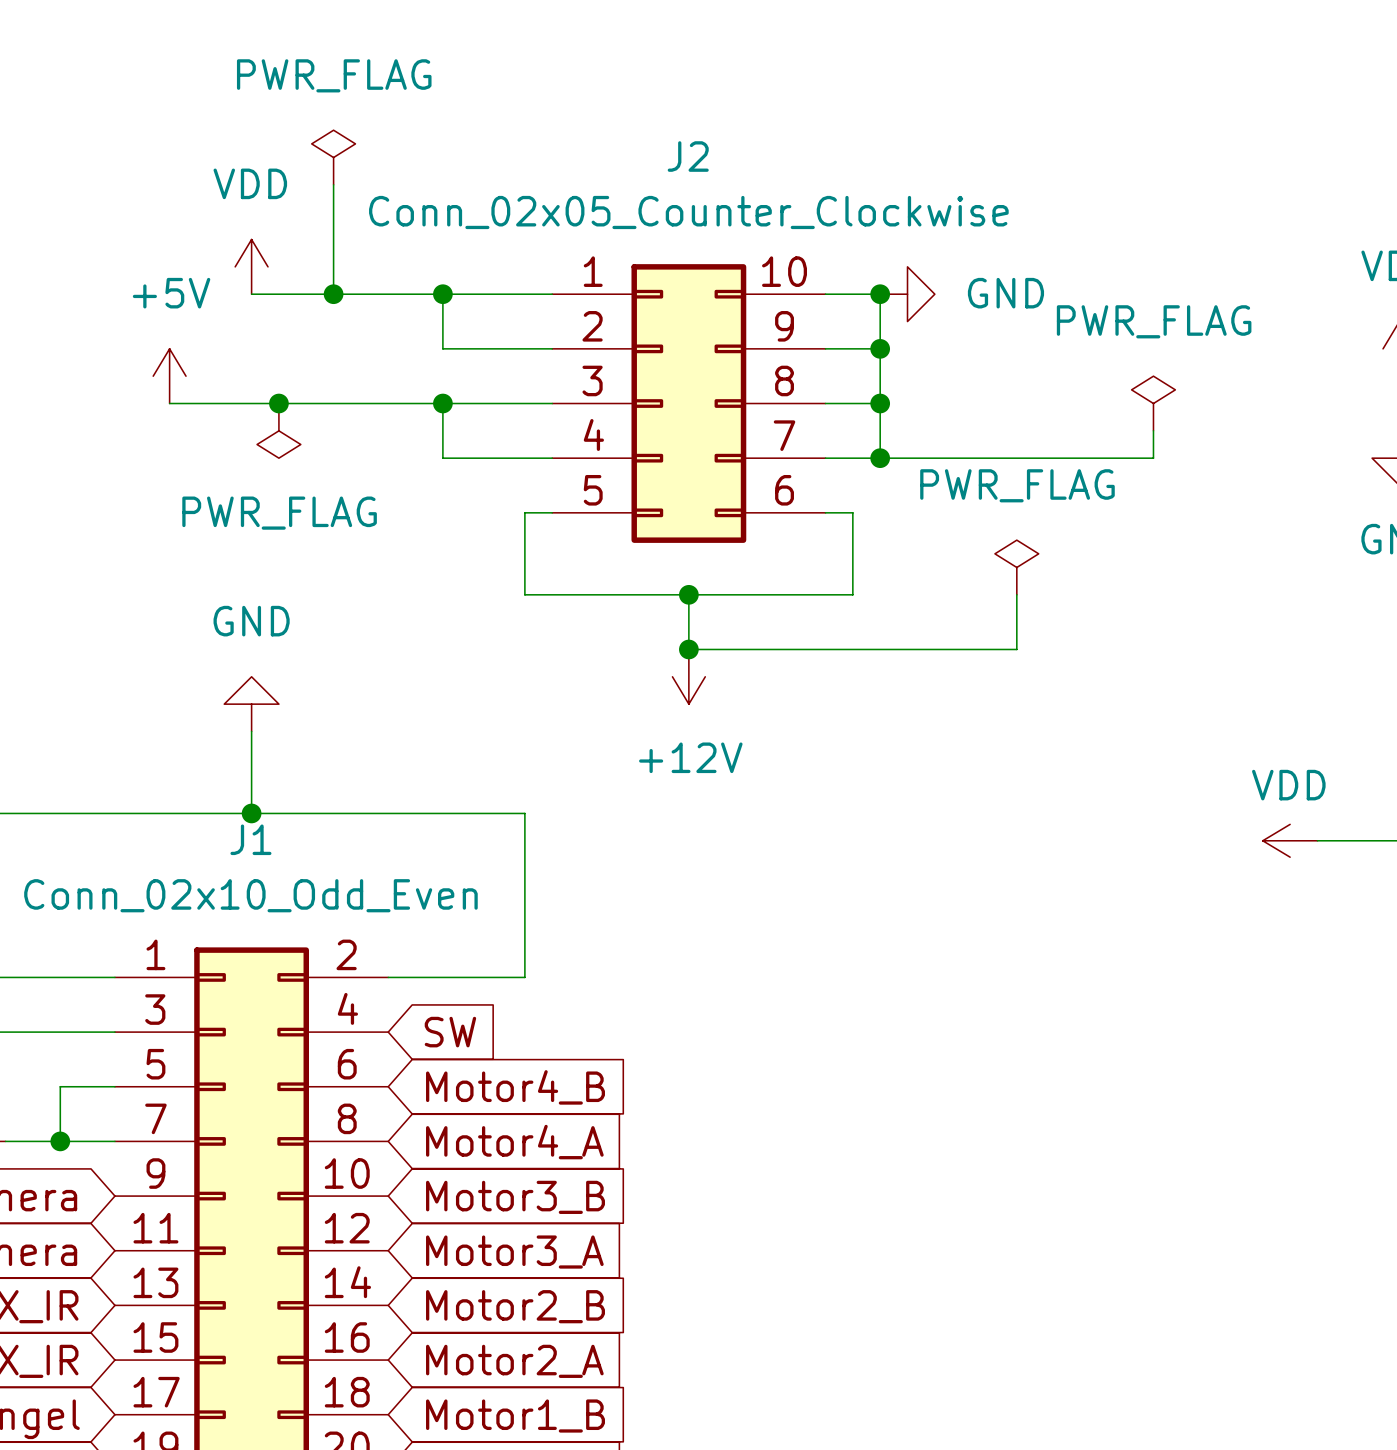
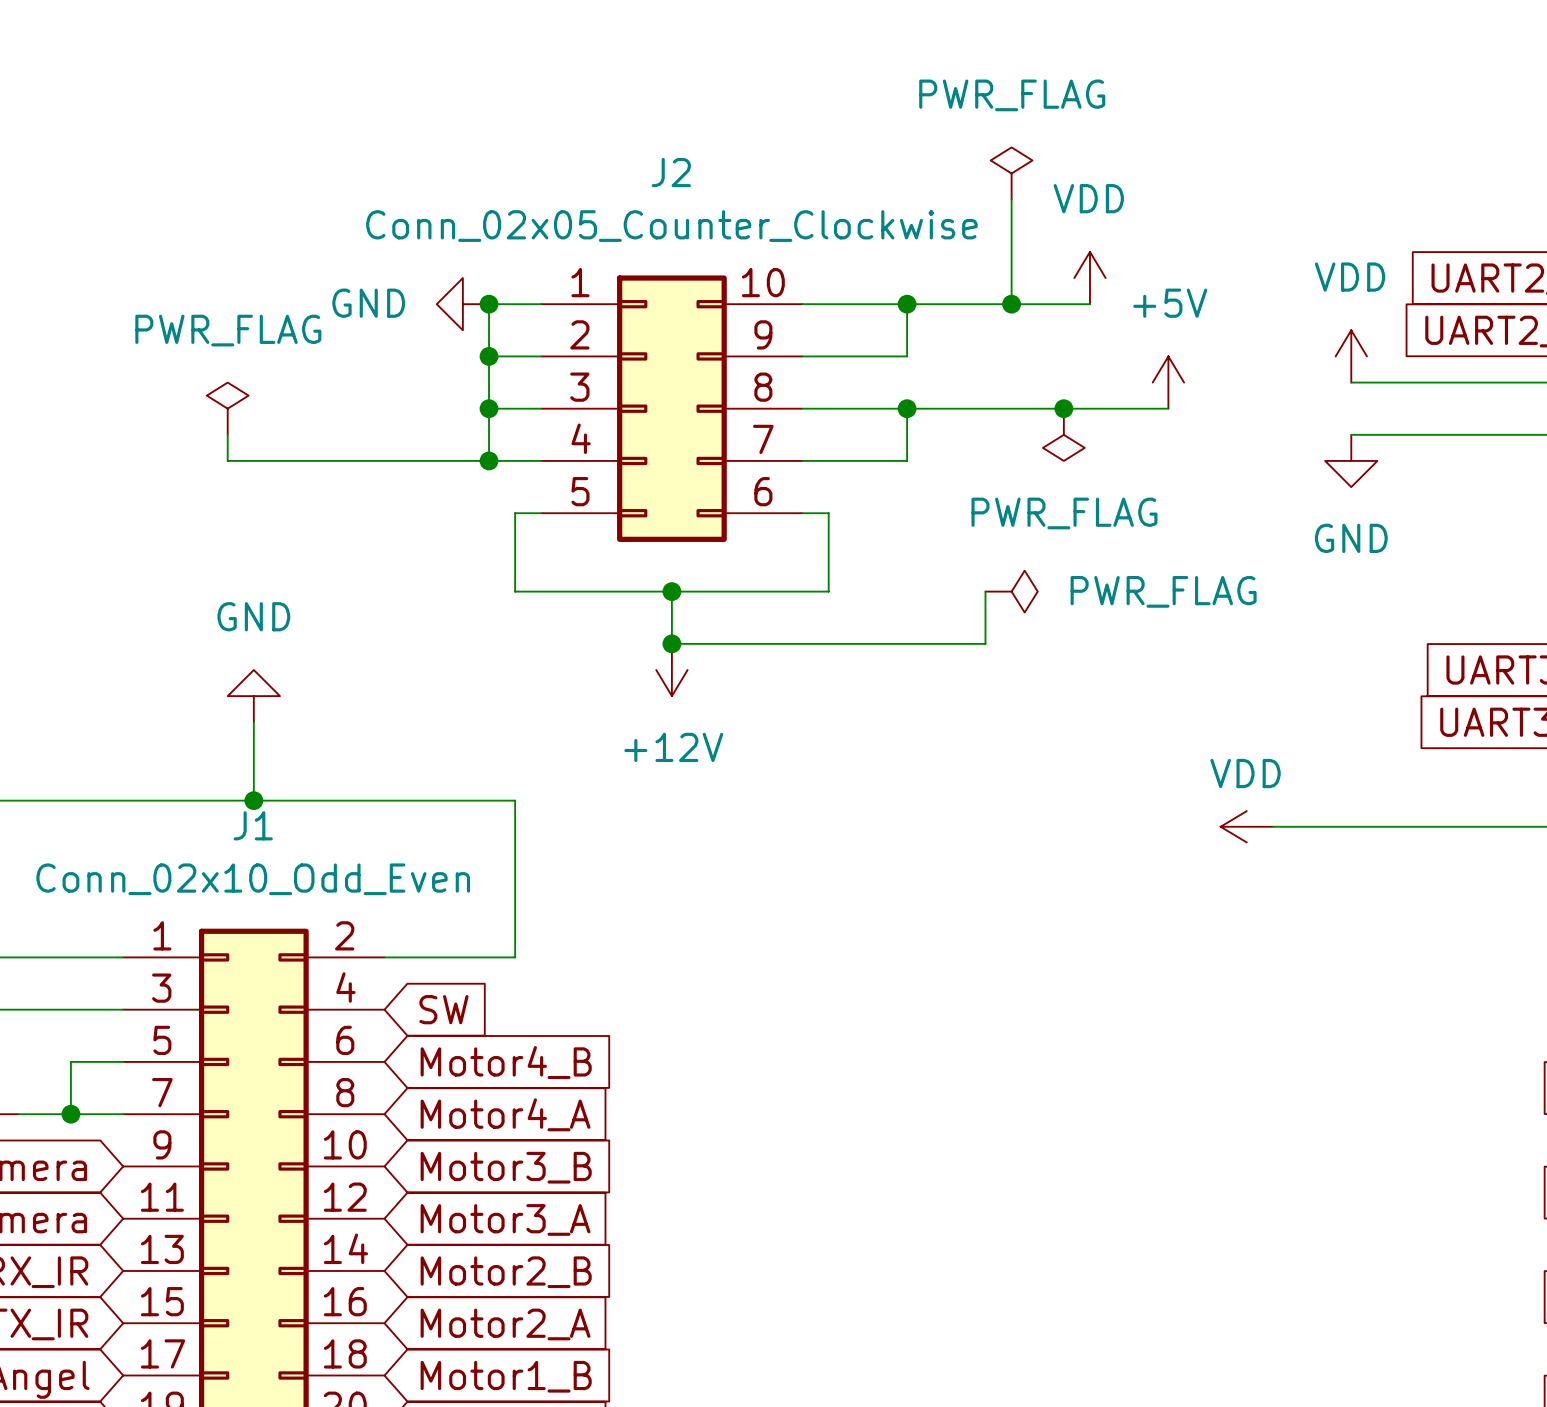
power symbol: PWR_FLAG (333, 157) -> none
power symbol: none -> PWR_FLAG (1011, 173)
wire: (333, 184) (333, 294) -> none
wire: none -> (1011, 199) (1011, 304)
power symbol: VDD (251, 266) -> none
power symbol: none -> VDD (1089, 278)
wire: (251, 294) (497, 294) -> (489, 460) (489, 304)
junction: (333, 294) -> none
wire: (442, 294) (442, 348) (497, 348) -> none
junction: (442, 294) -> none
junction: none -> (489, 304)
wire: (880, 294) (880, 458) -> (854, 304) (1089, 304)
junction: (880, 294) -> none
power symbol rotation: 0° (907, 294) -> 180° (462, 304)
power symbol position: GND (907, 294) -> GND (462, 304)
wire: none -> (907, 304) (907, 356) (854, 356)
junction: none -> (907, 304)
junction: none -> (1011, 304)
junction: none -> (489, 356)
junction: (880, 348) -> none
power symbol: +5V (169, 376) -> none
power symbol: none -> +5V (1168, 382)
wire: (169, 403) (497, 403) -> none
junction: (278, 403) -> none
wire: (442, 403) (442, 458) -> (227, 434) (227, 460) (436, 460)
junction: (442, 403) -> none
junction: none -> (489, 408)
wire: none -> (854, 408) (1168, 408)
junction: (880, 403) -> none
junction: none -> (907, 408)
junction: none -> (1063, 408)
power symbol rotation: 0° (1153, 403) -> 180° (1063, 434)
power symbol position: PWR_FLAG (1153, 403) -> PWR_FLAG (1063, 434)
power symbol rotation: 0° (278, 430) -> 180° (227, 408)
power symbol position: PWR_FLAG (278, 430) -> PWR_FLAG (227, 408)
wire: (1153, 430) (1153, 458) (934, 458) -> (907, 408) (907, 460)
junction: none -> (489, 460)
junction: (880, 458) -> none
power symbol text position: PWR_FLAG (1017, 485) -> PWR_FLAG (1163, 591)
power symbol rotation: 0° (1016, 567) -> 90° clockwise (1011, 591)
power symbol position: PWR_FLAG (1016, 567) -> PWR_FLAG (1011, 591)

